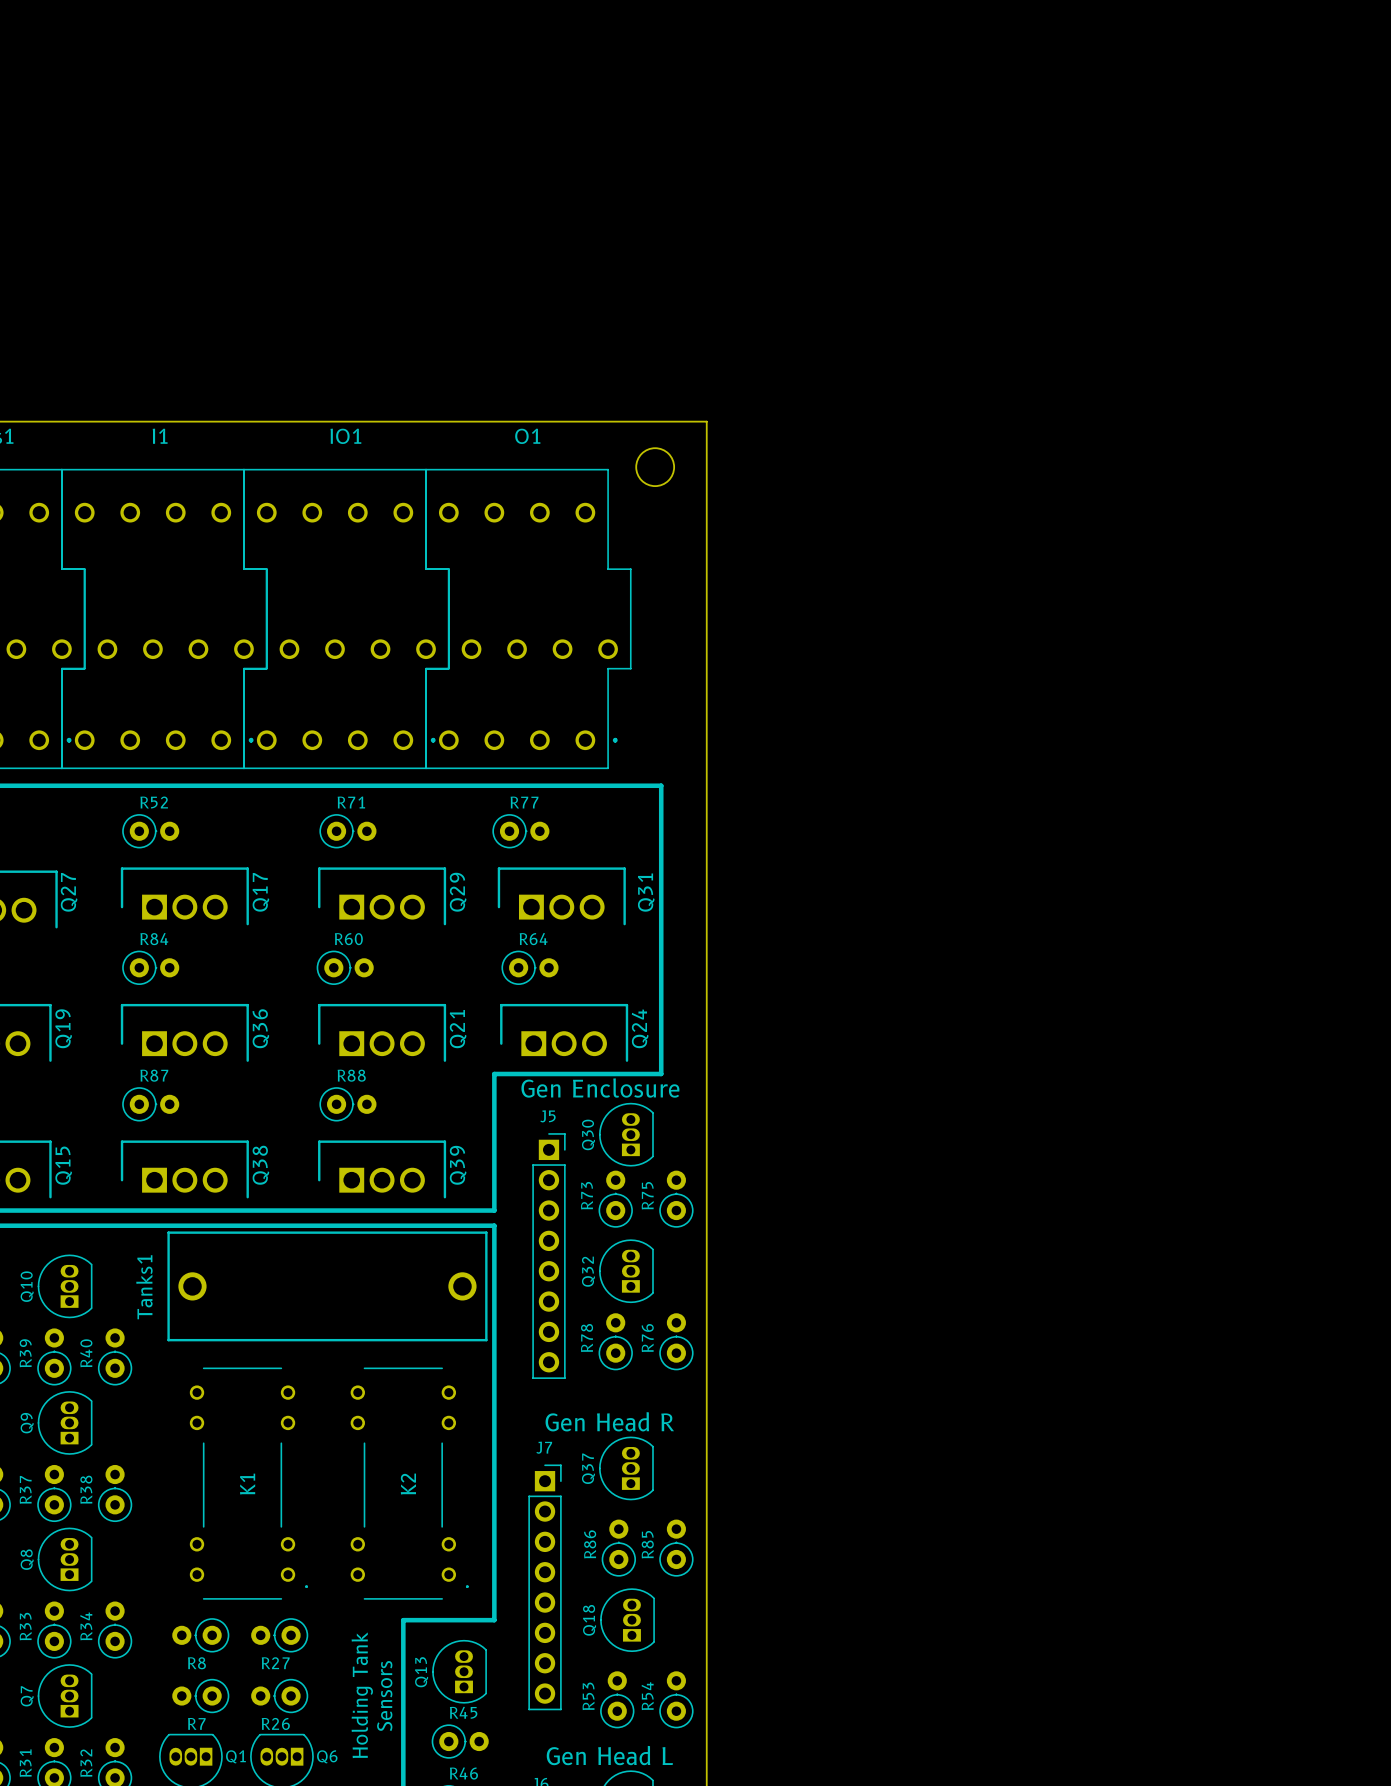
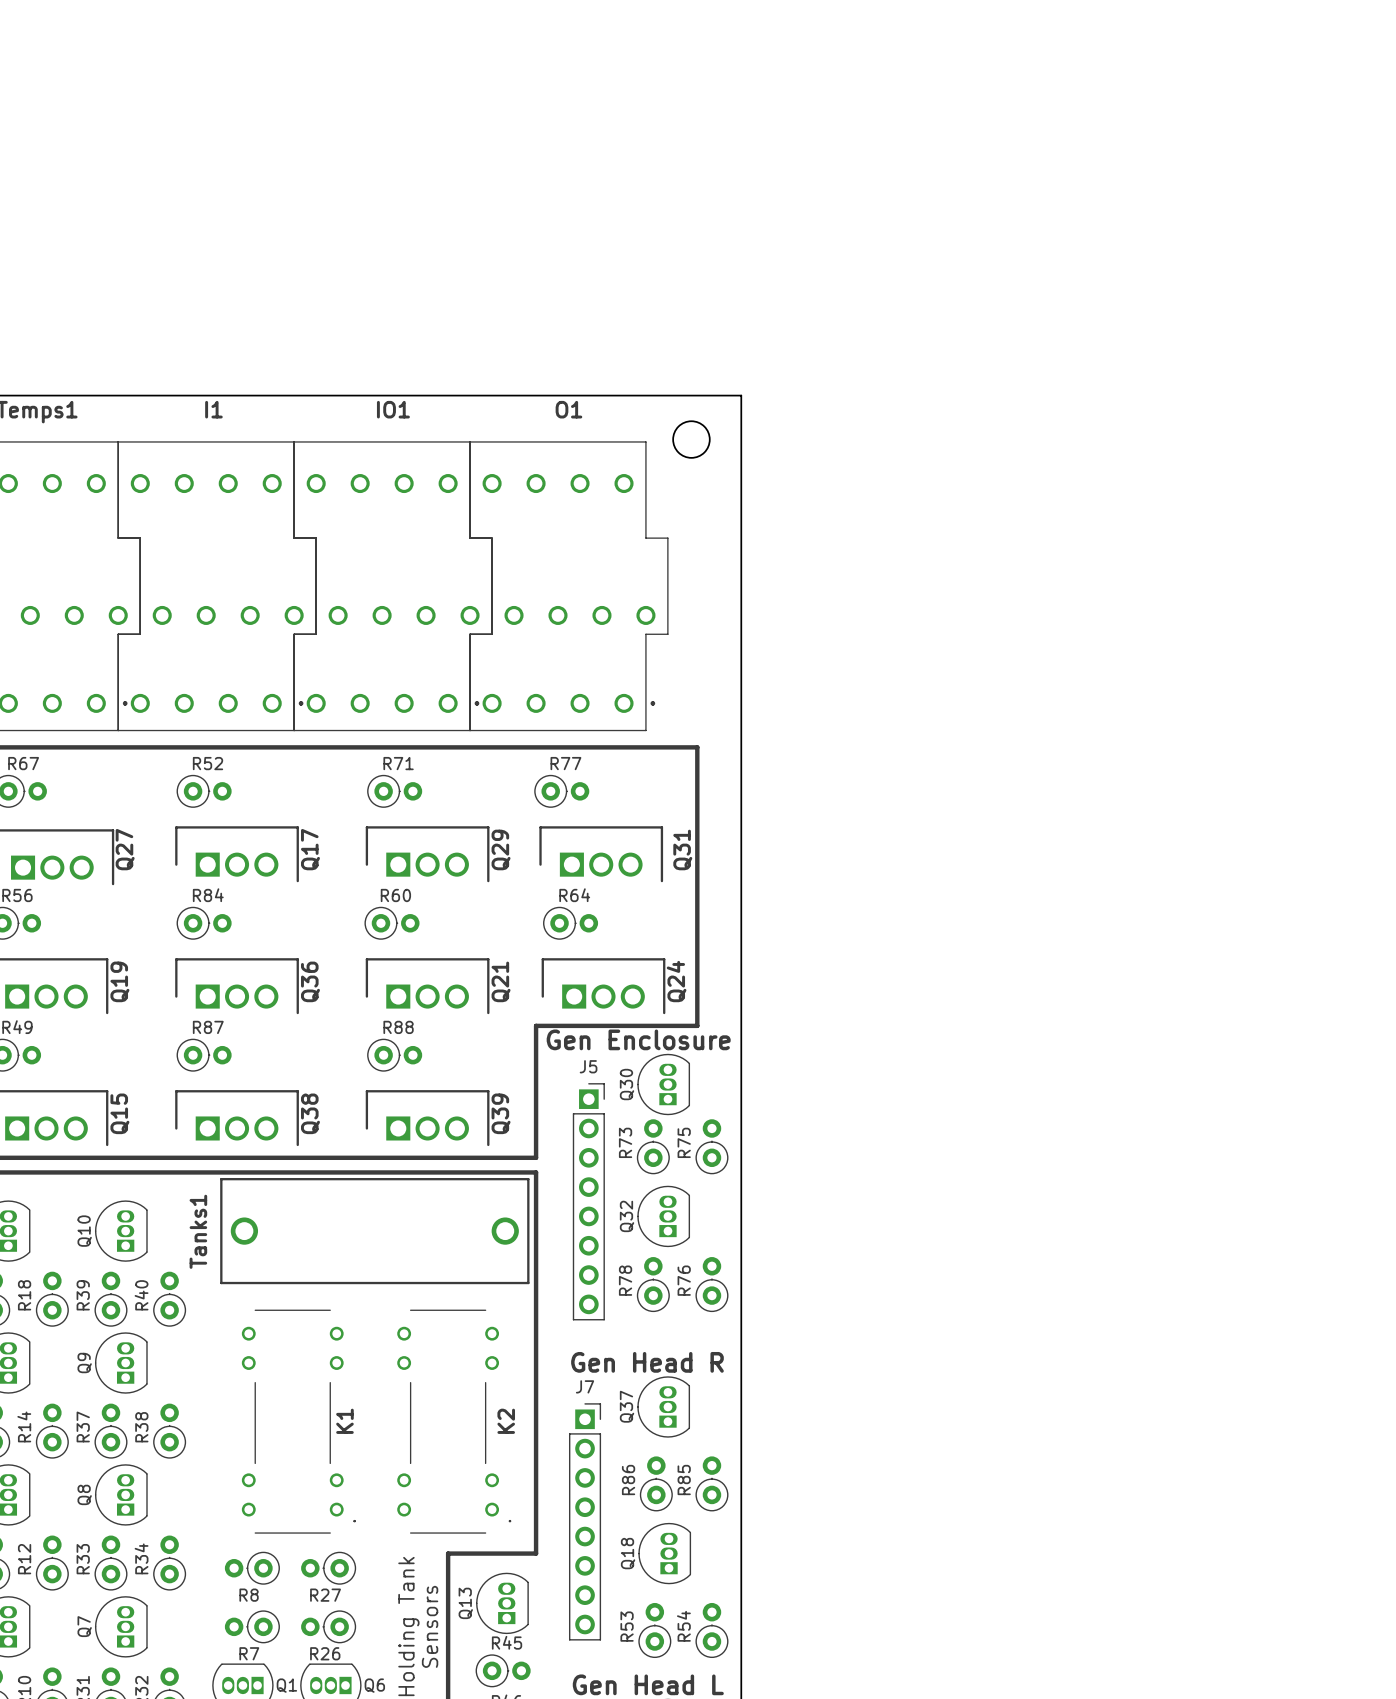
K1 name position: K1 (247, 1484) -> K1 (344, 1421)
K2 name position: K2 (408, 1484) -> K2 (506, 1421)

